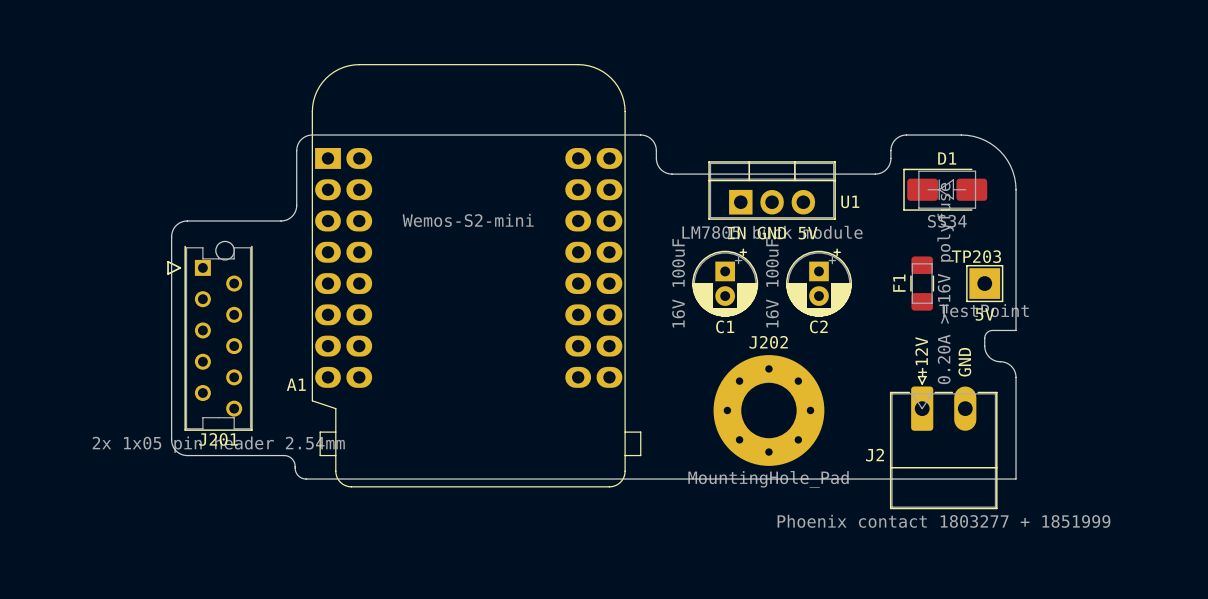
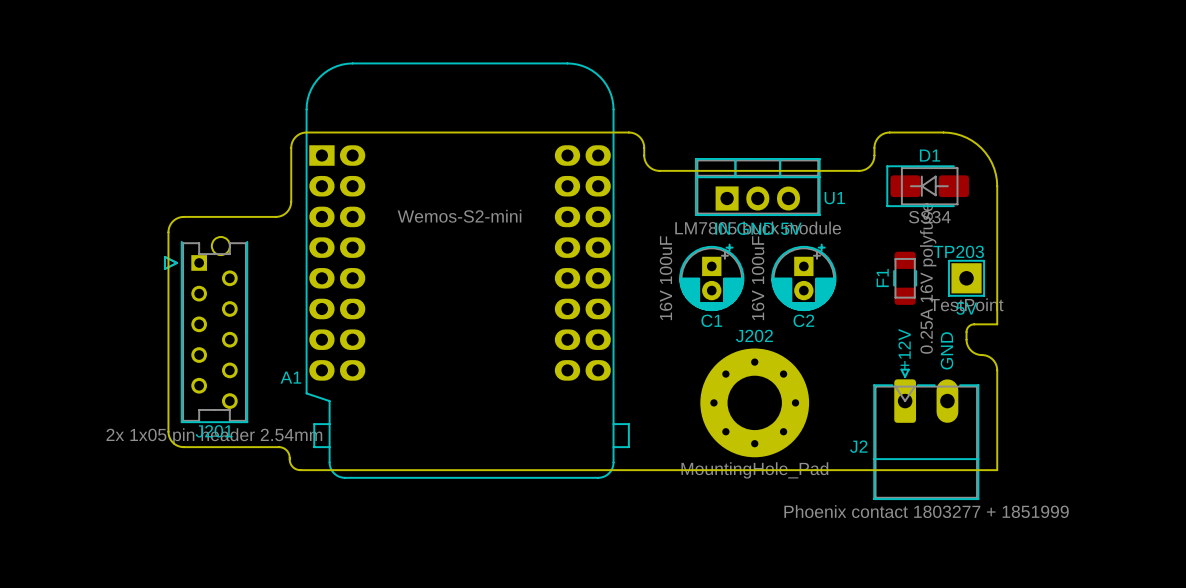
F1 value: 0.20A >=16V polyfuse (945, 283) -> 0.25A 16V polyfuse (928, 278)

